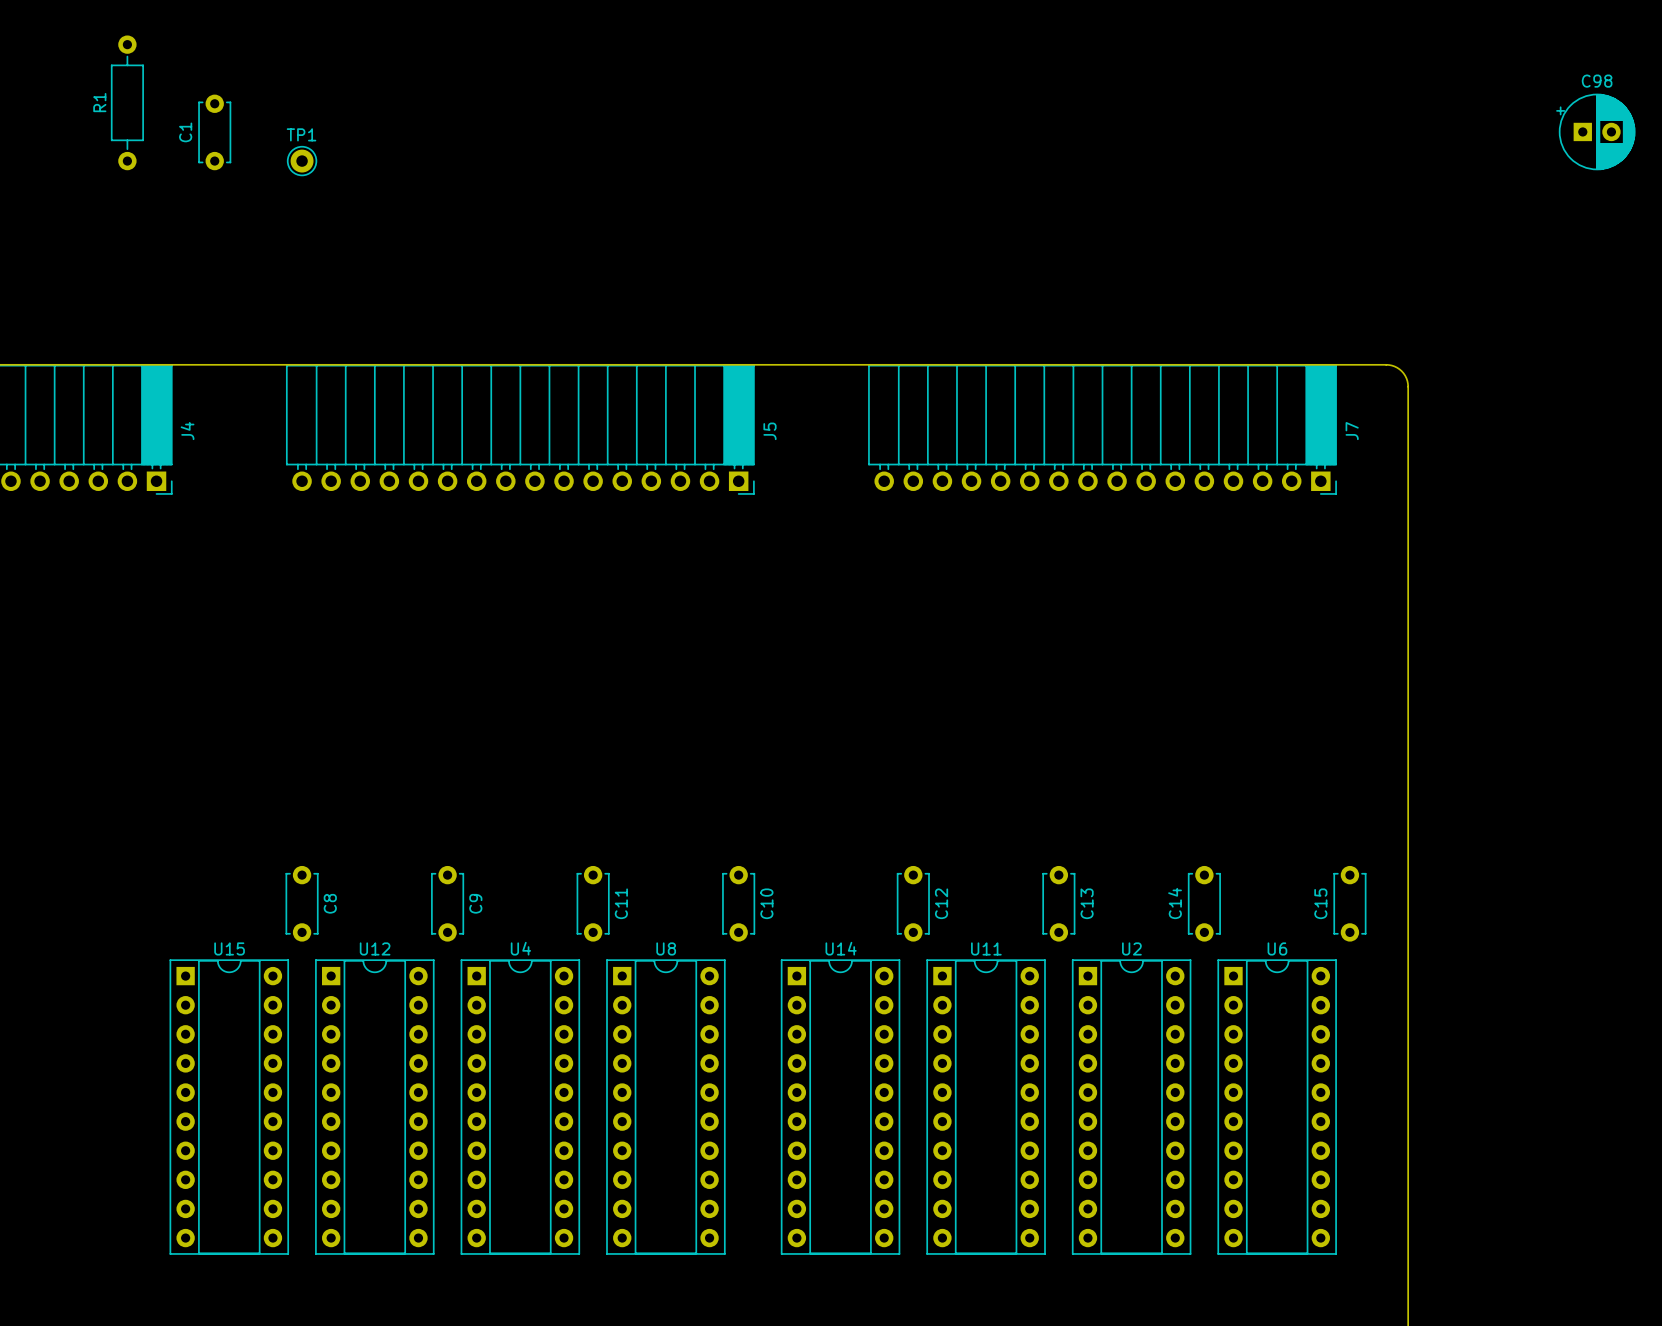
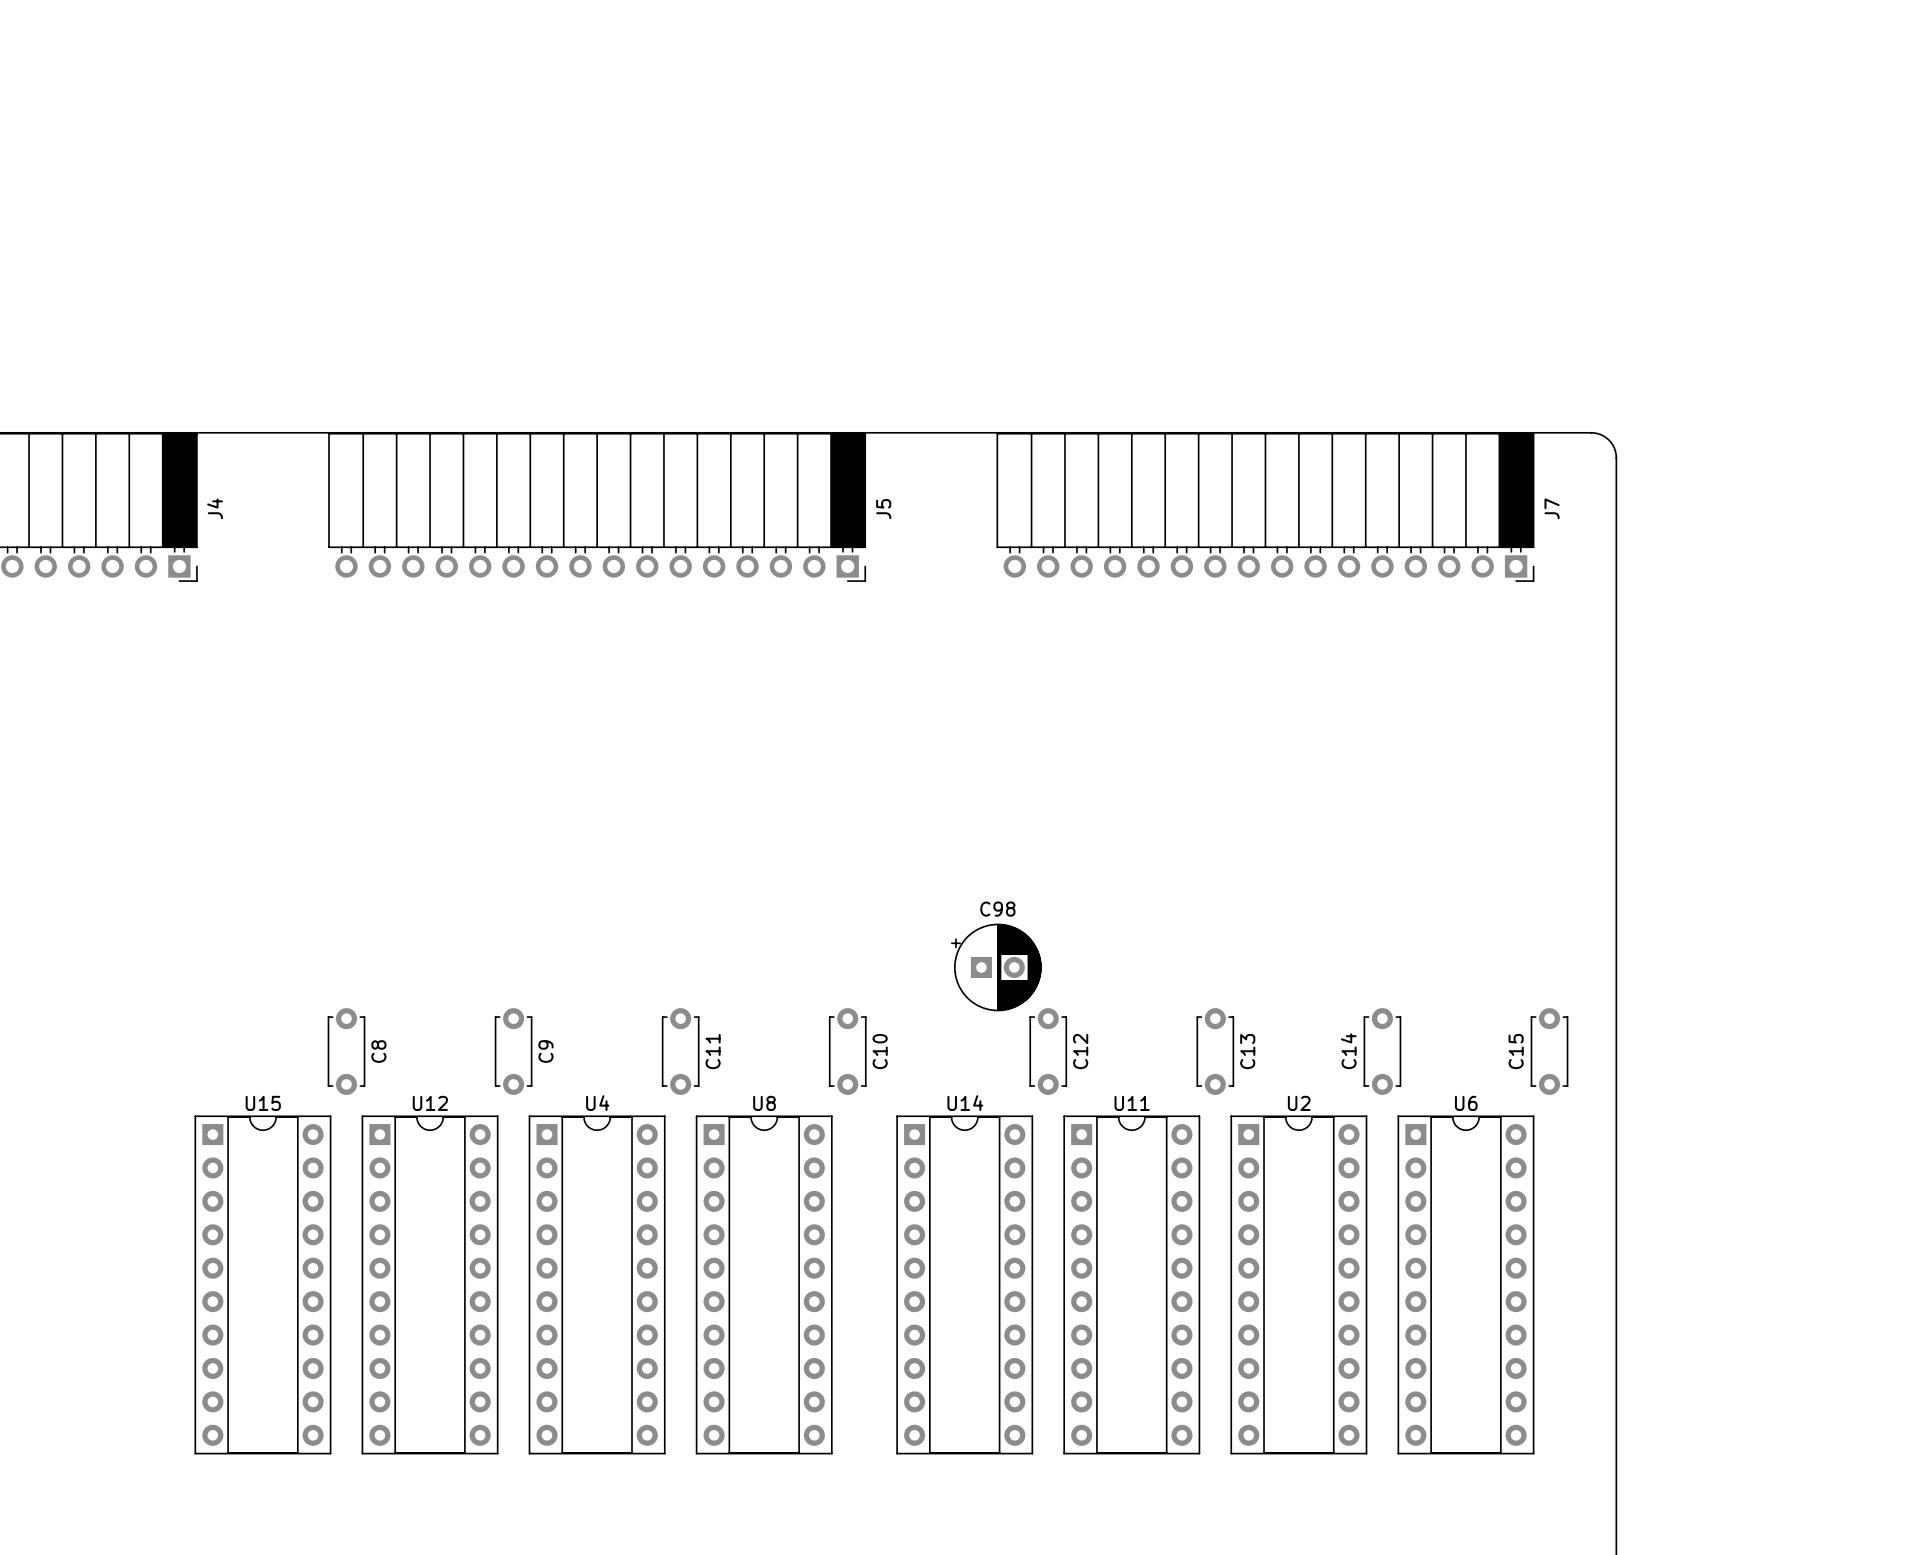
R1: (127, 102) -> none
C98 position: (1595, 131) -> (996, 967)
C1: (214, 132) -> none
TP1: (302, 161) -> none

